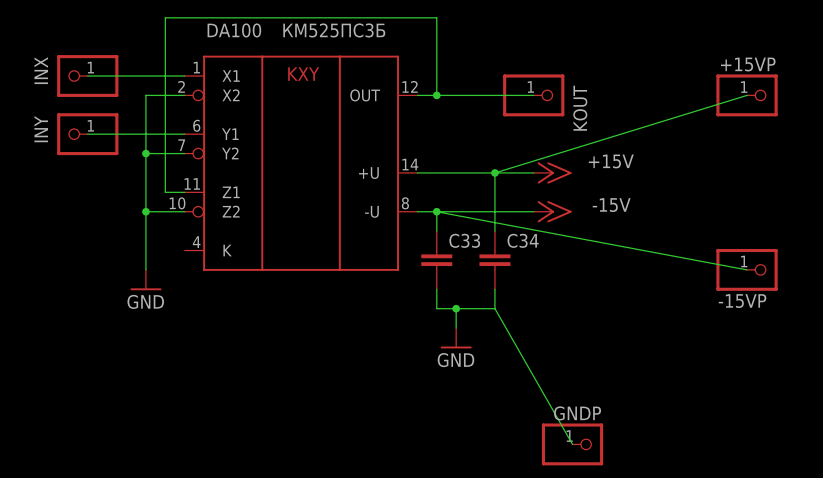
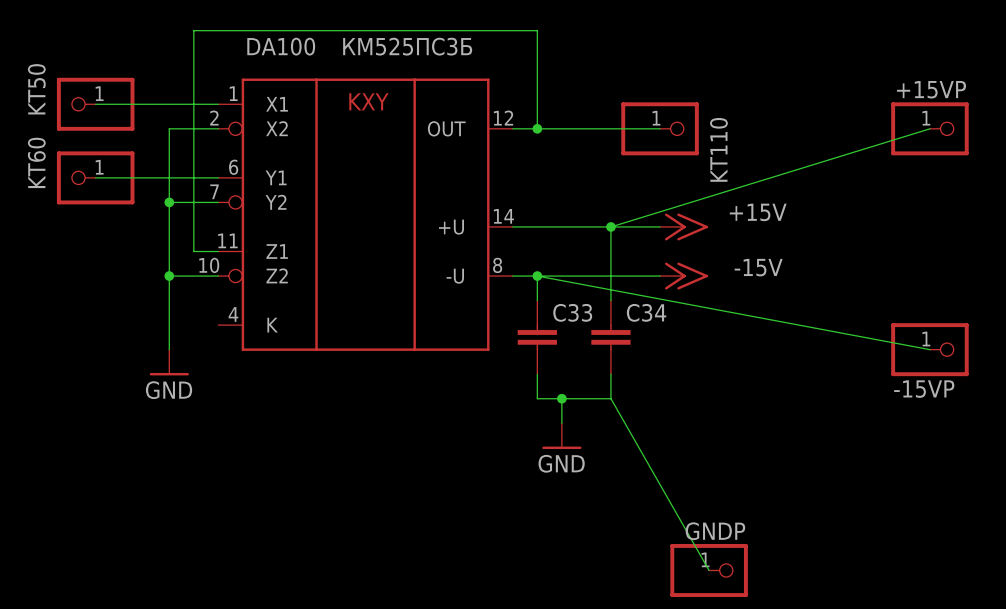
INX name: INX (41, 70) -> KT50 (36, 89)
KOUT name: KOUT (580, 108) -> KT110 (718, 149)
INY name: INY (41, 129) -> KT60 (36, 162)

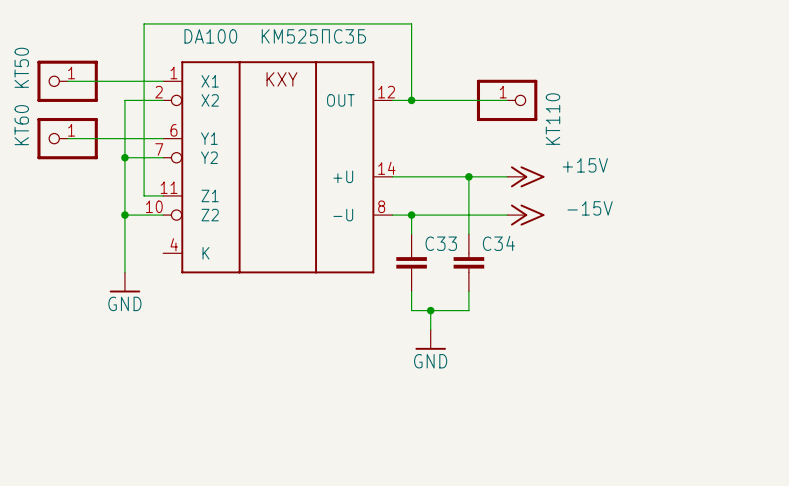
wire: (929, 128) (610, 226) -> none
+15VP: (929, 128) -> none
wire: (537, 276) (929, 349) -> none
-15VP: (929, 349) -> none
wire: (610, 398) (709, 570) -> none
GNDP: (709, 570) -> none

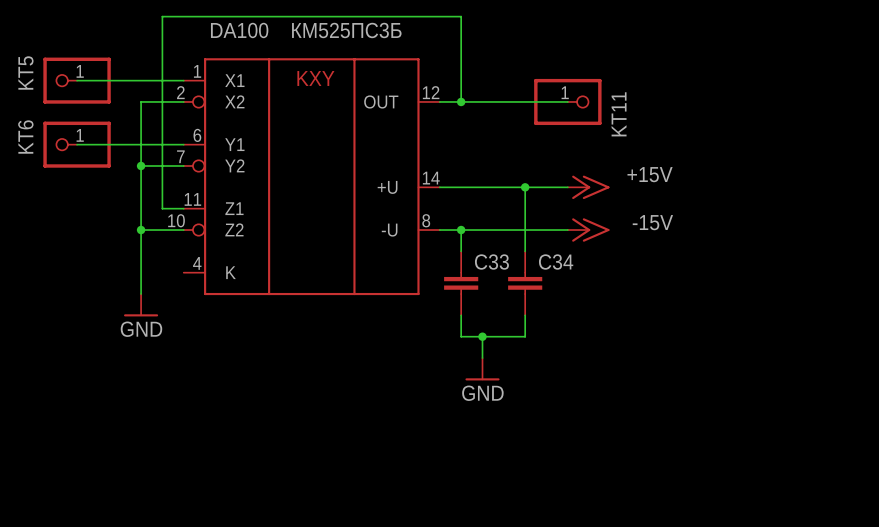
KT50 name: KT50 (21, 67) -> KT5 (25, 72)
KT110 name: KT110 (553, 119) -> KT11 (619, 114)
KT60 name: KT60 (21, 125) -> KT6 (25, 137)

